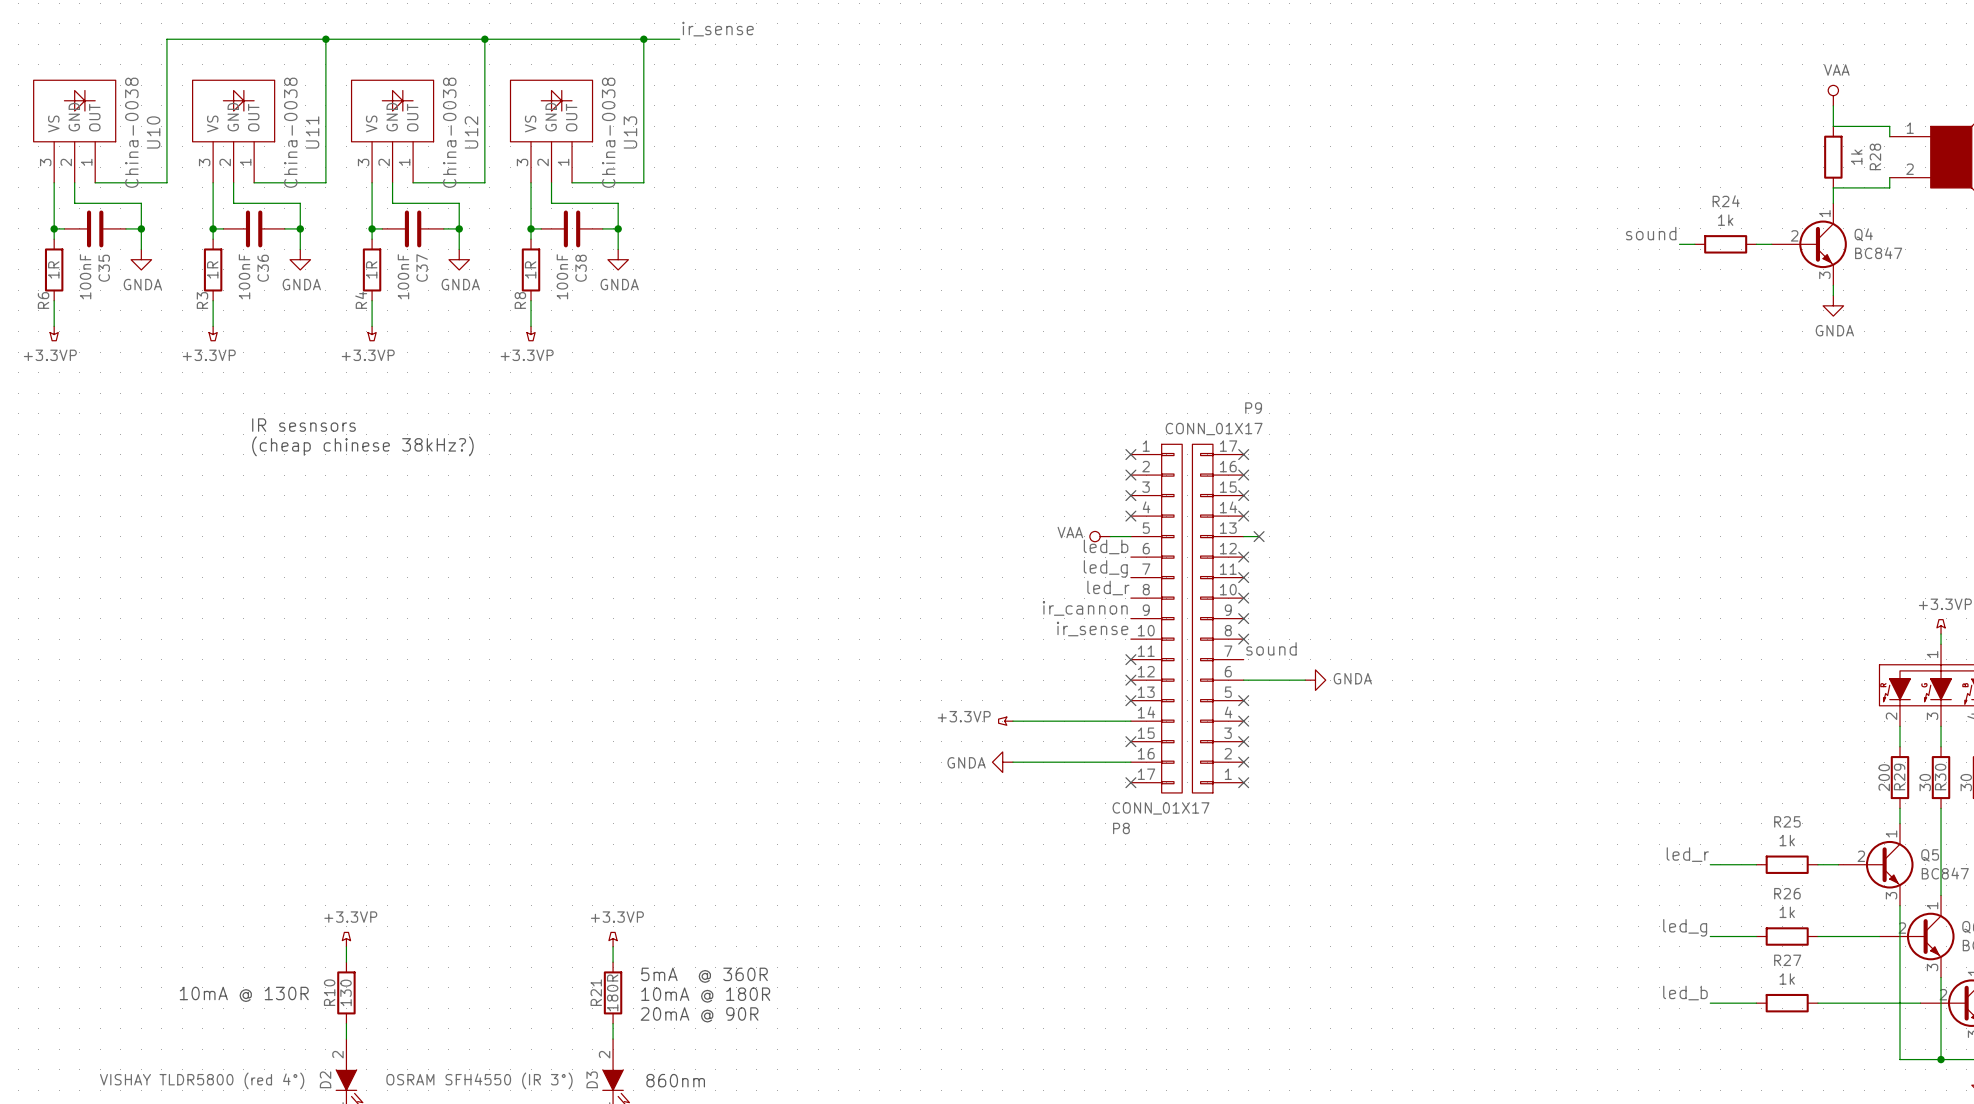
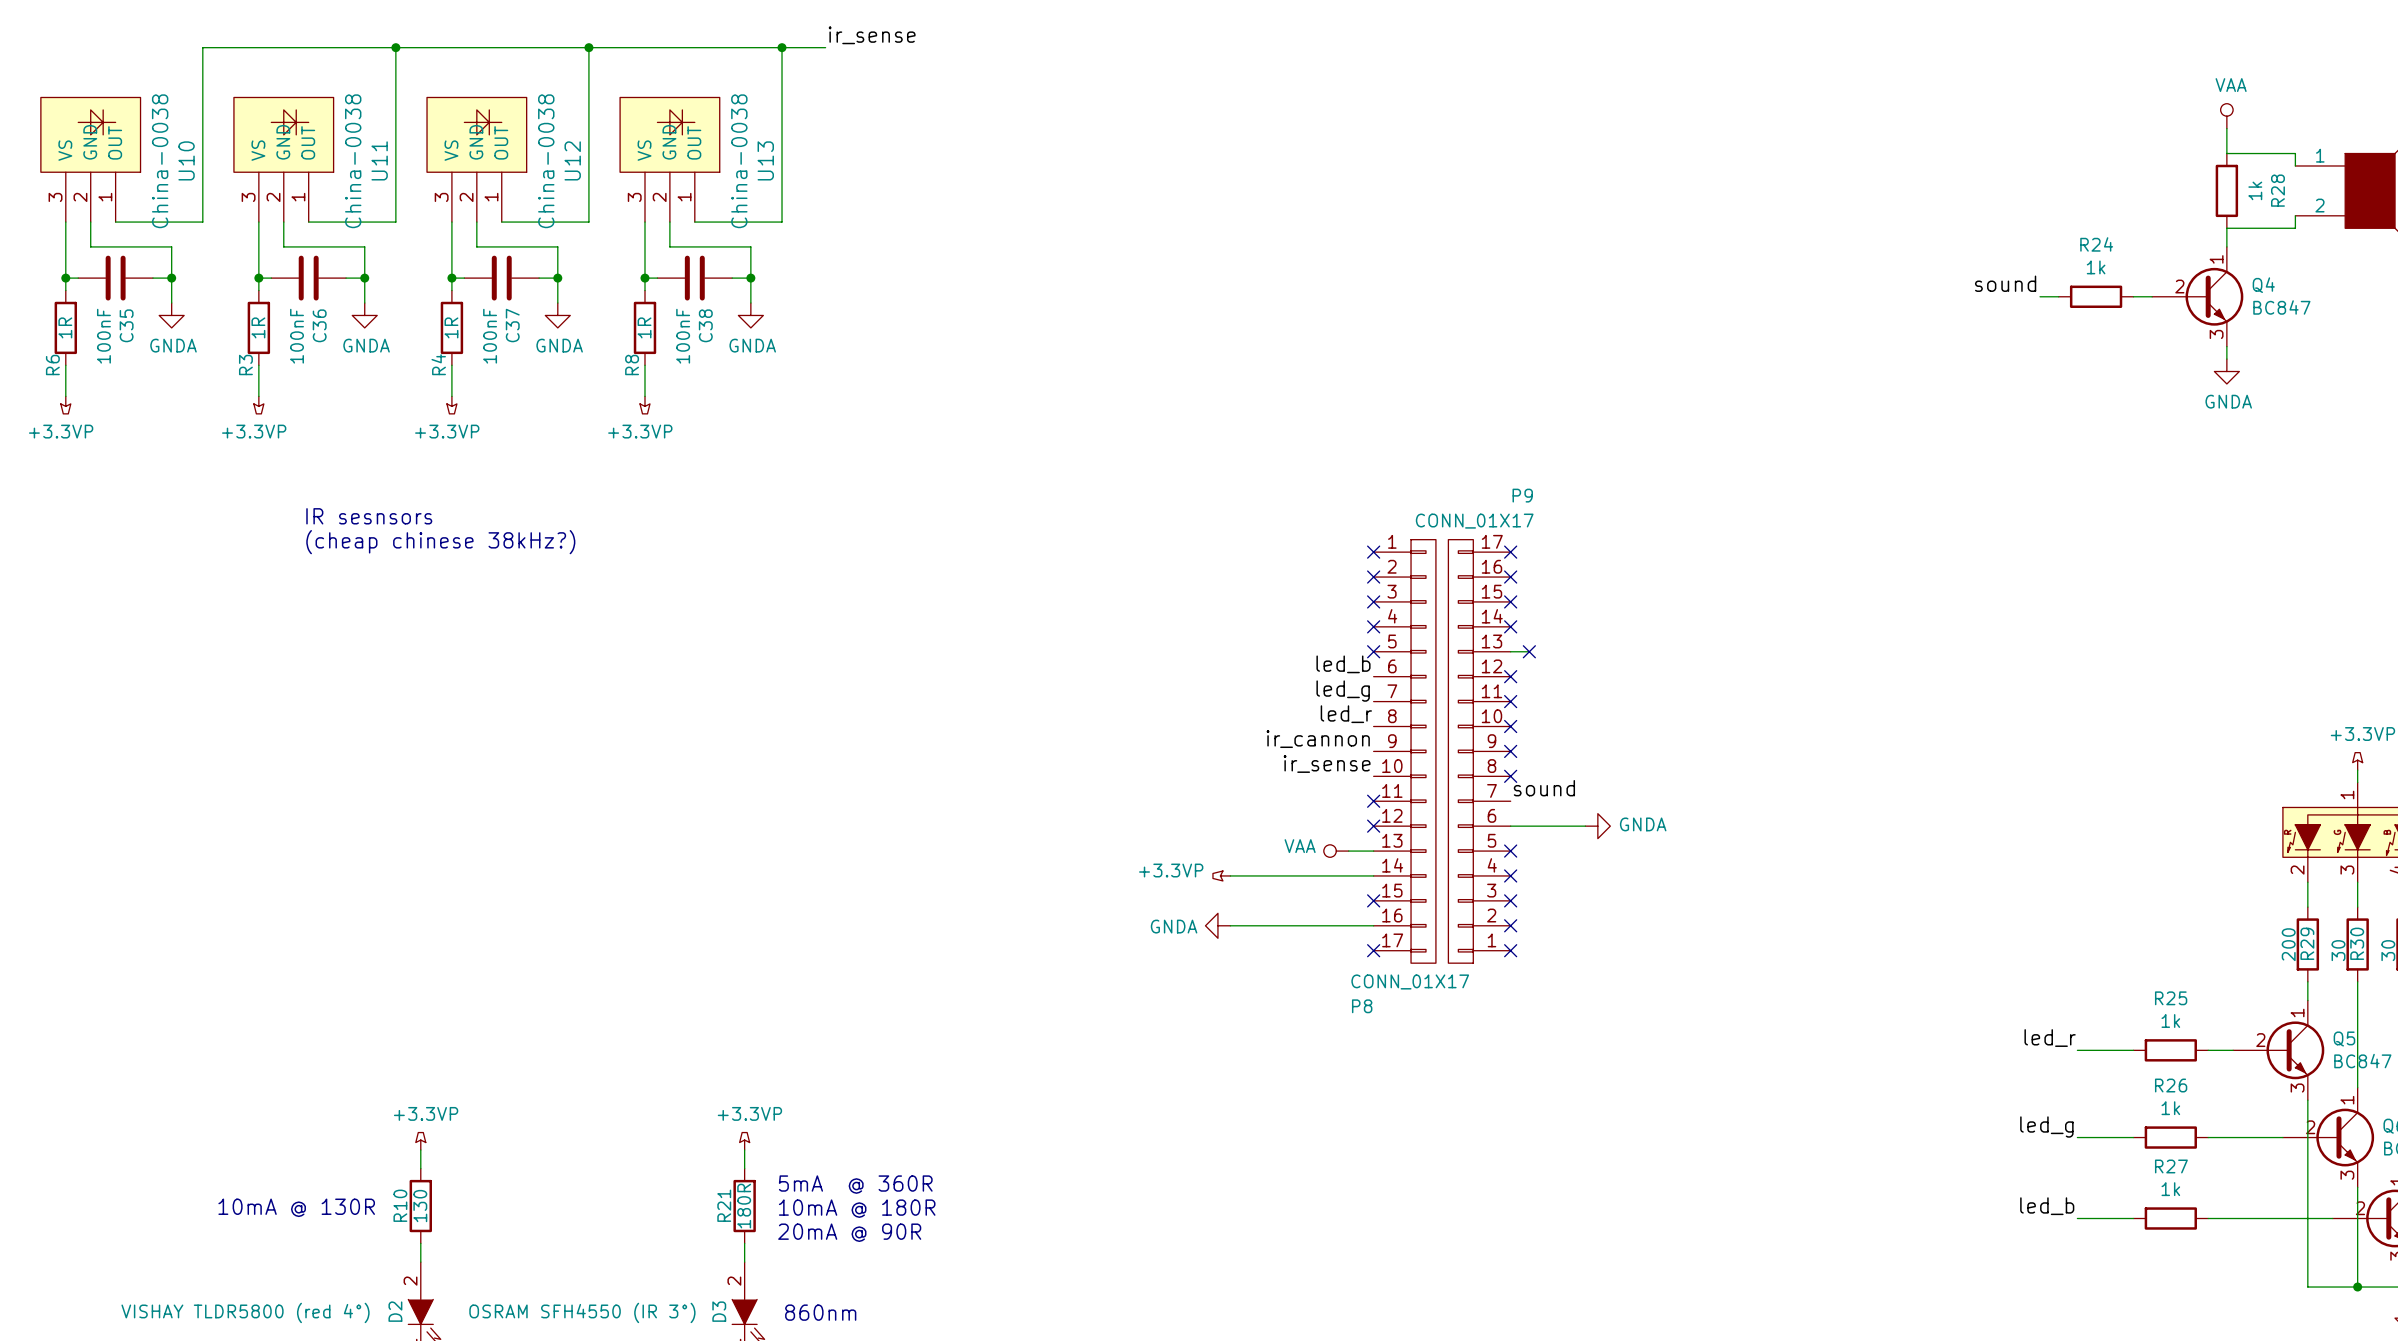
power symbol position: VAA (1100, 536) -> VAA (1336, 851)
wire: (1110, 536) (1130, 536) -> (1348, 851) (1373, 851)
no-connect mark: none -> (1373, 651)
no-connect mark: (1130, 700) -> none

